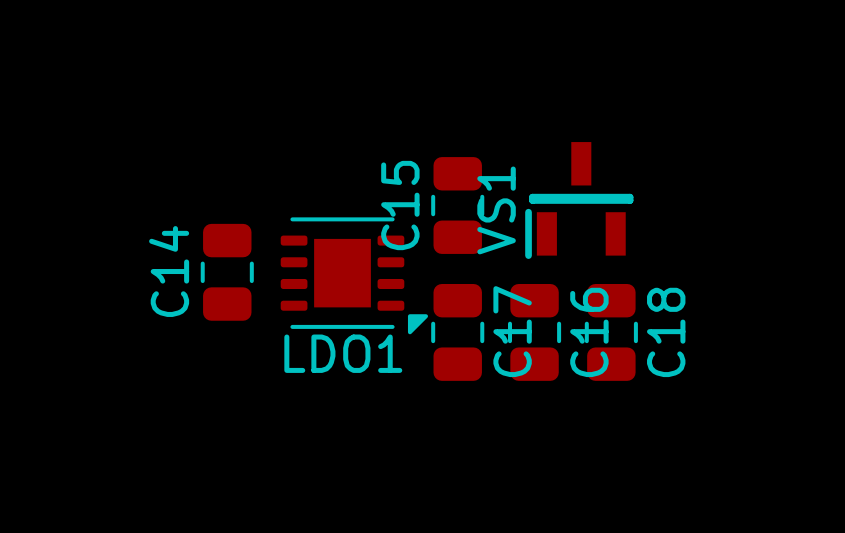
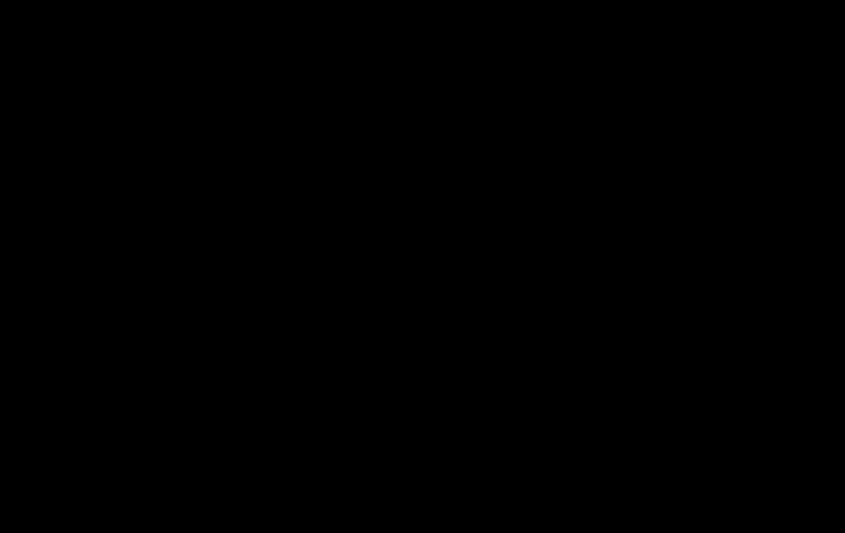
VS1: (579, 200) -> none
C15: (457, 205) -> none
C14: (227, 272) -> none
LDO1: (354, 275) -> none
C17: (457, 332) -> none
C16: (534, 332) -> none
C18: (611, 332) -> none

